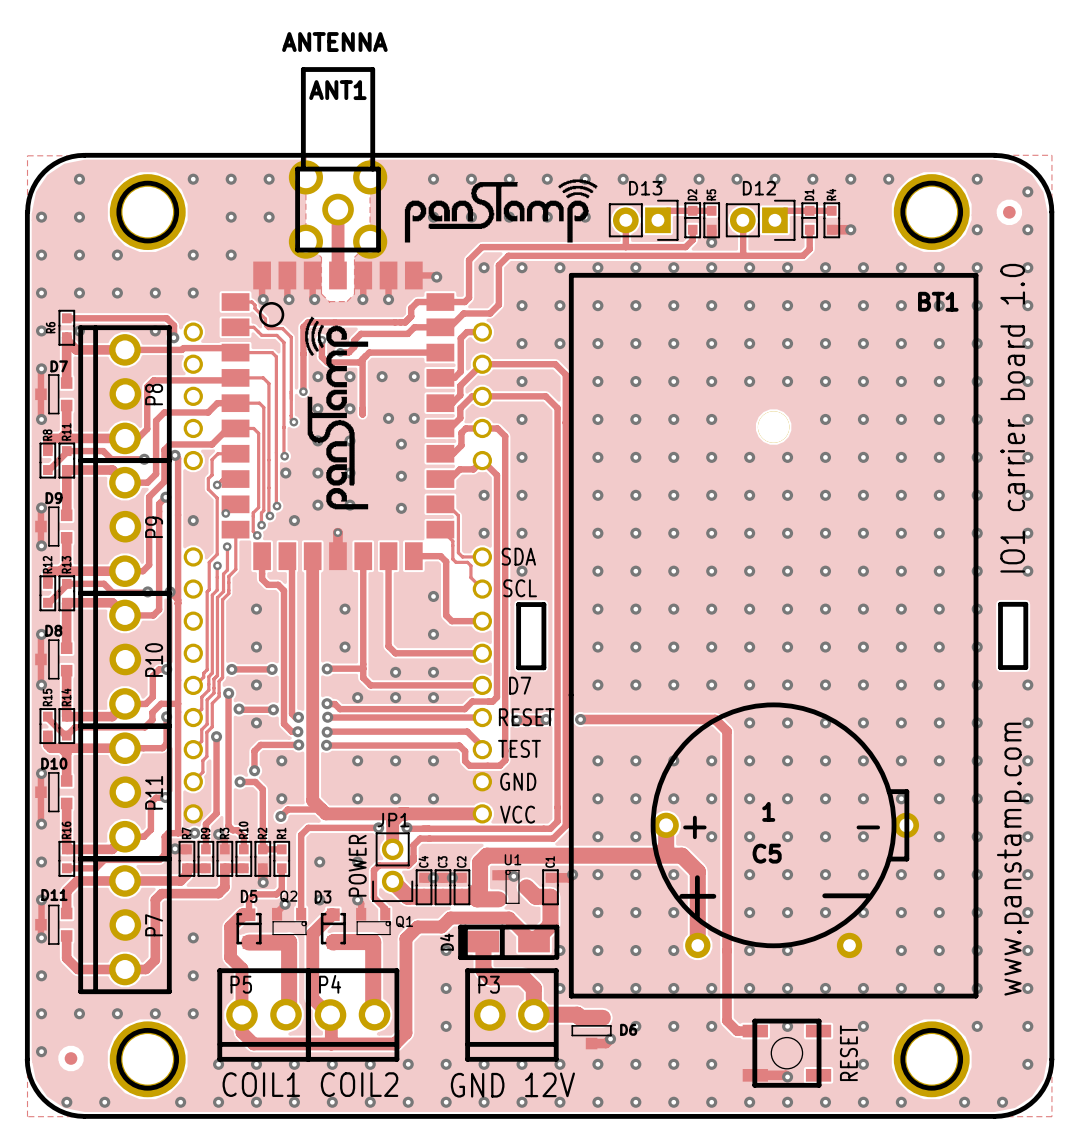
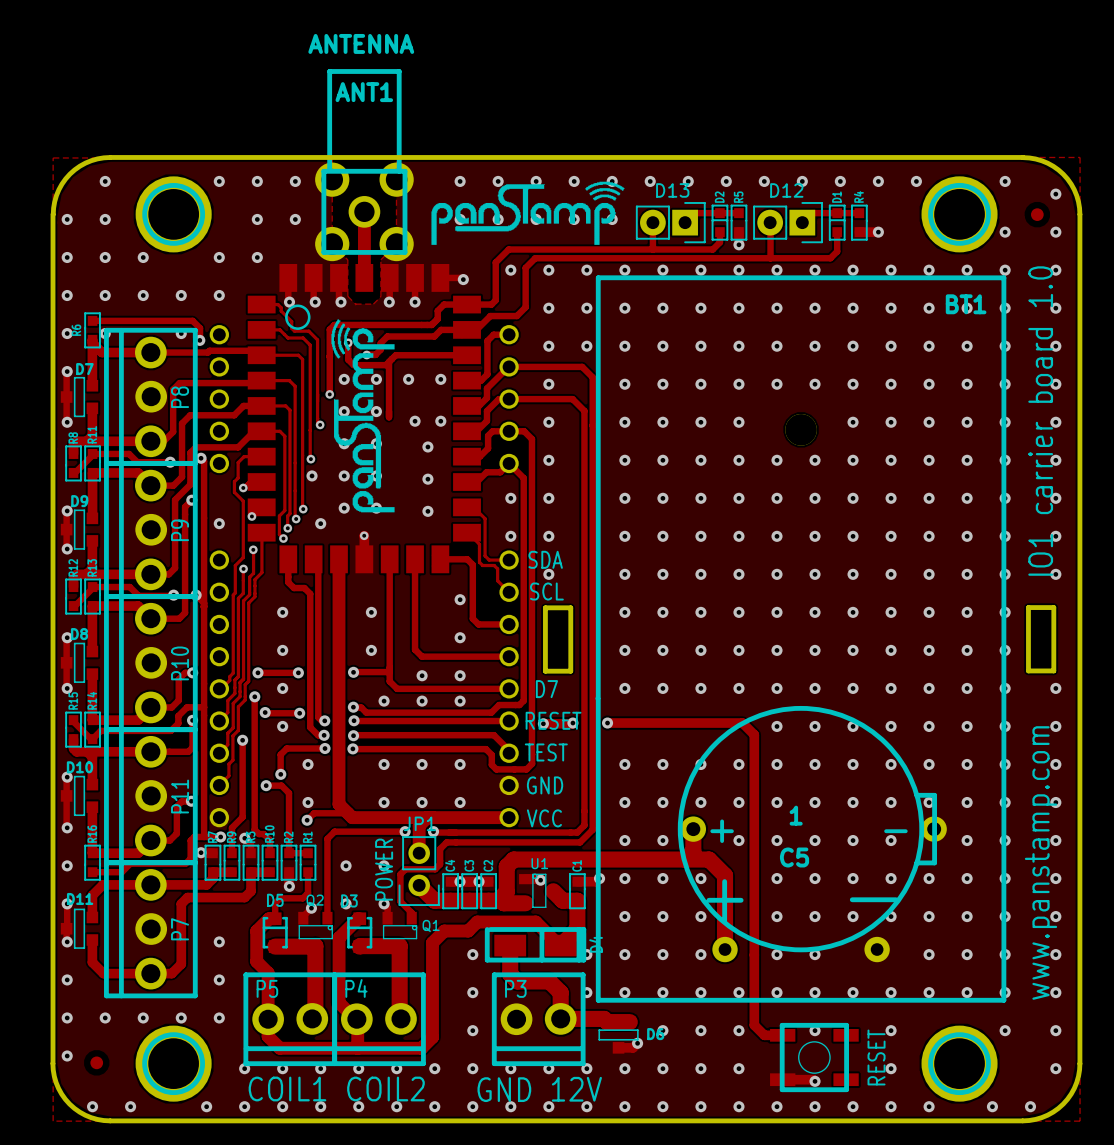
D4 rotation: 0° (508, 942) -> 180° (535, 944)

